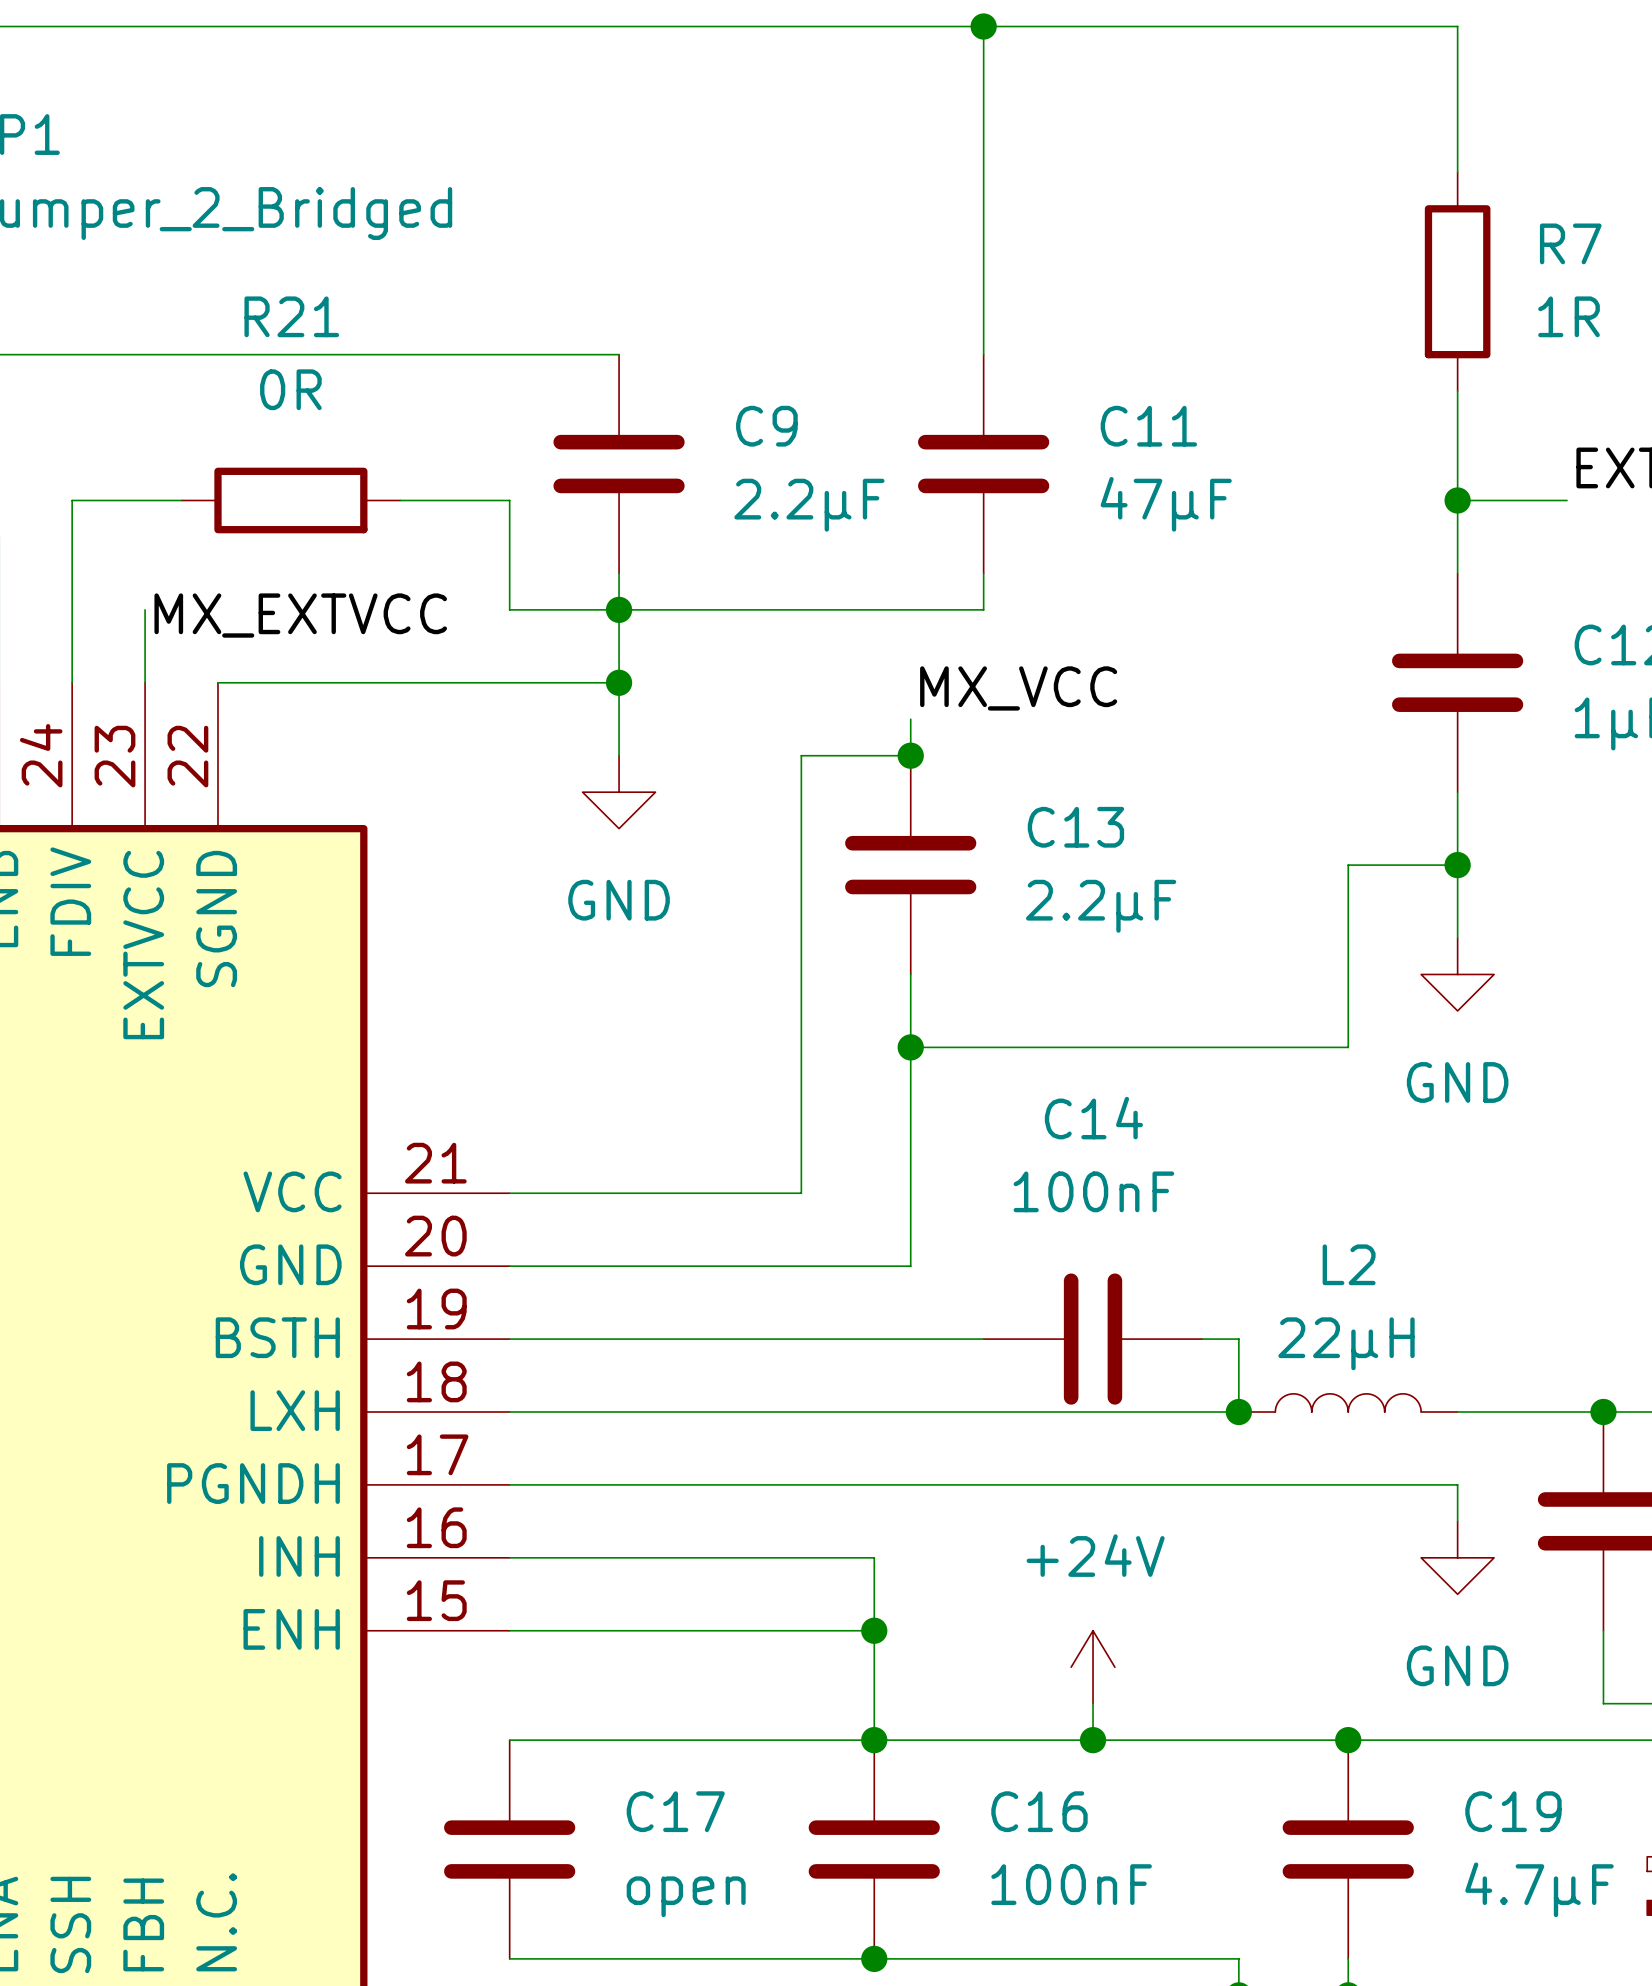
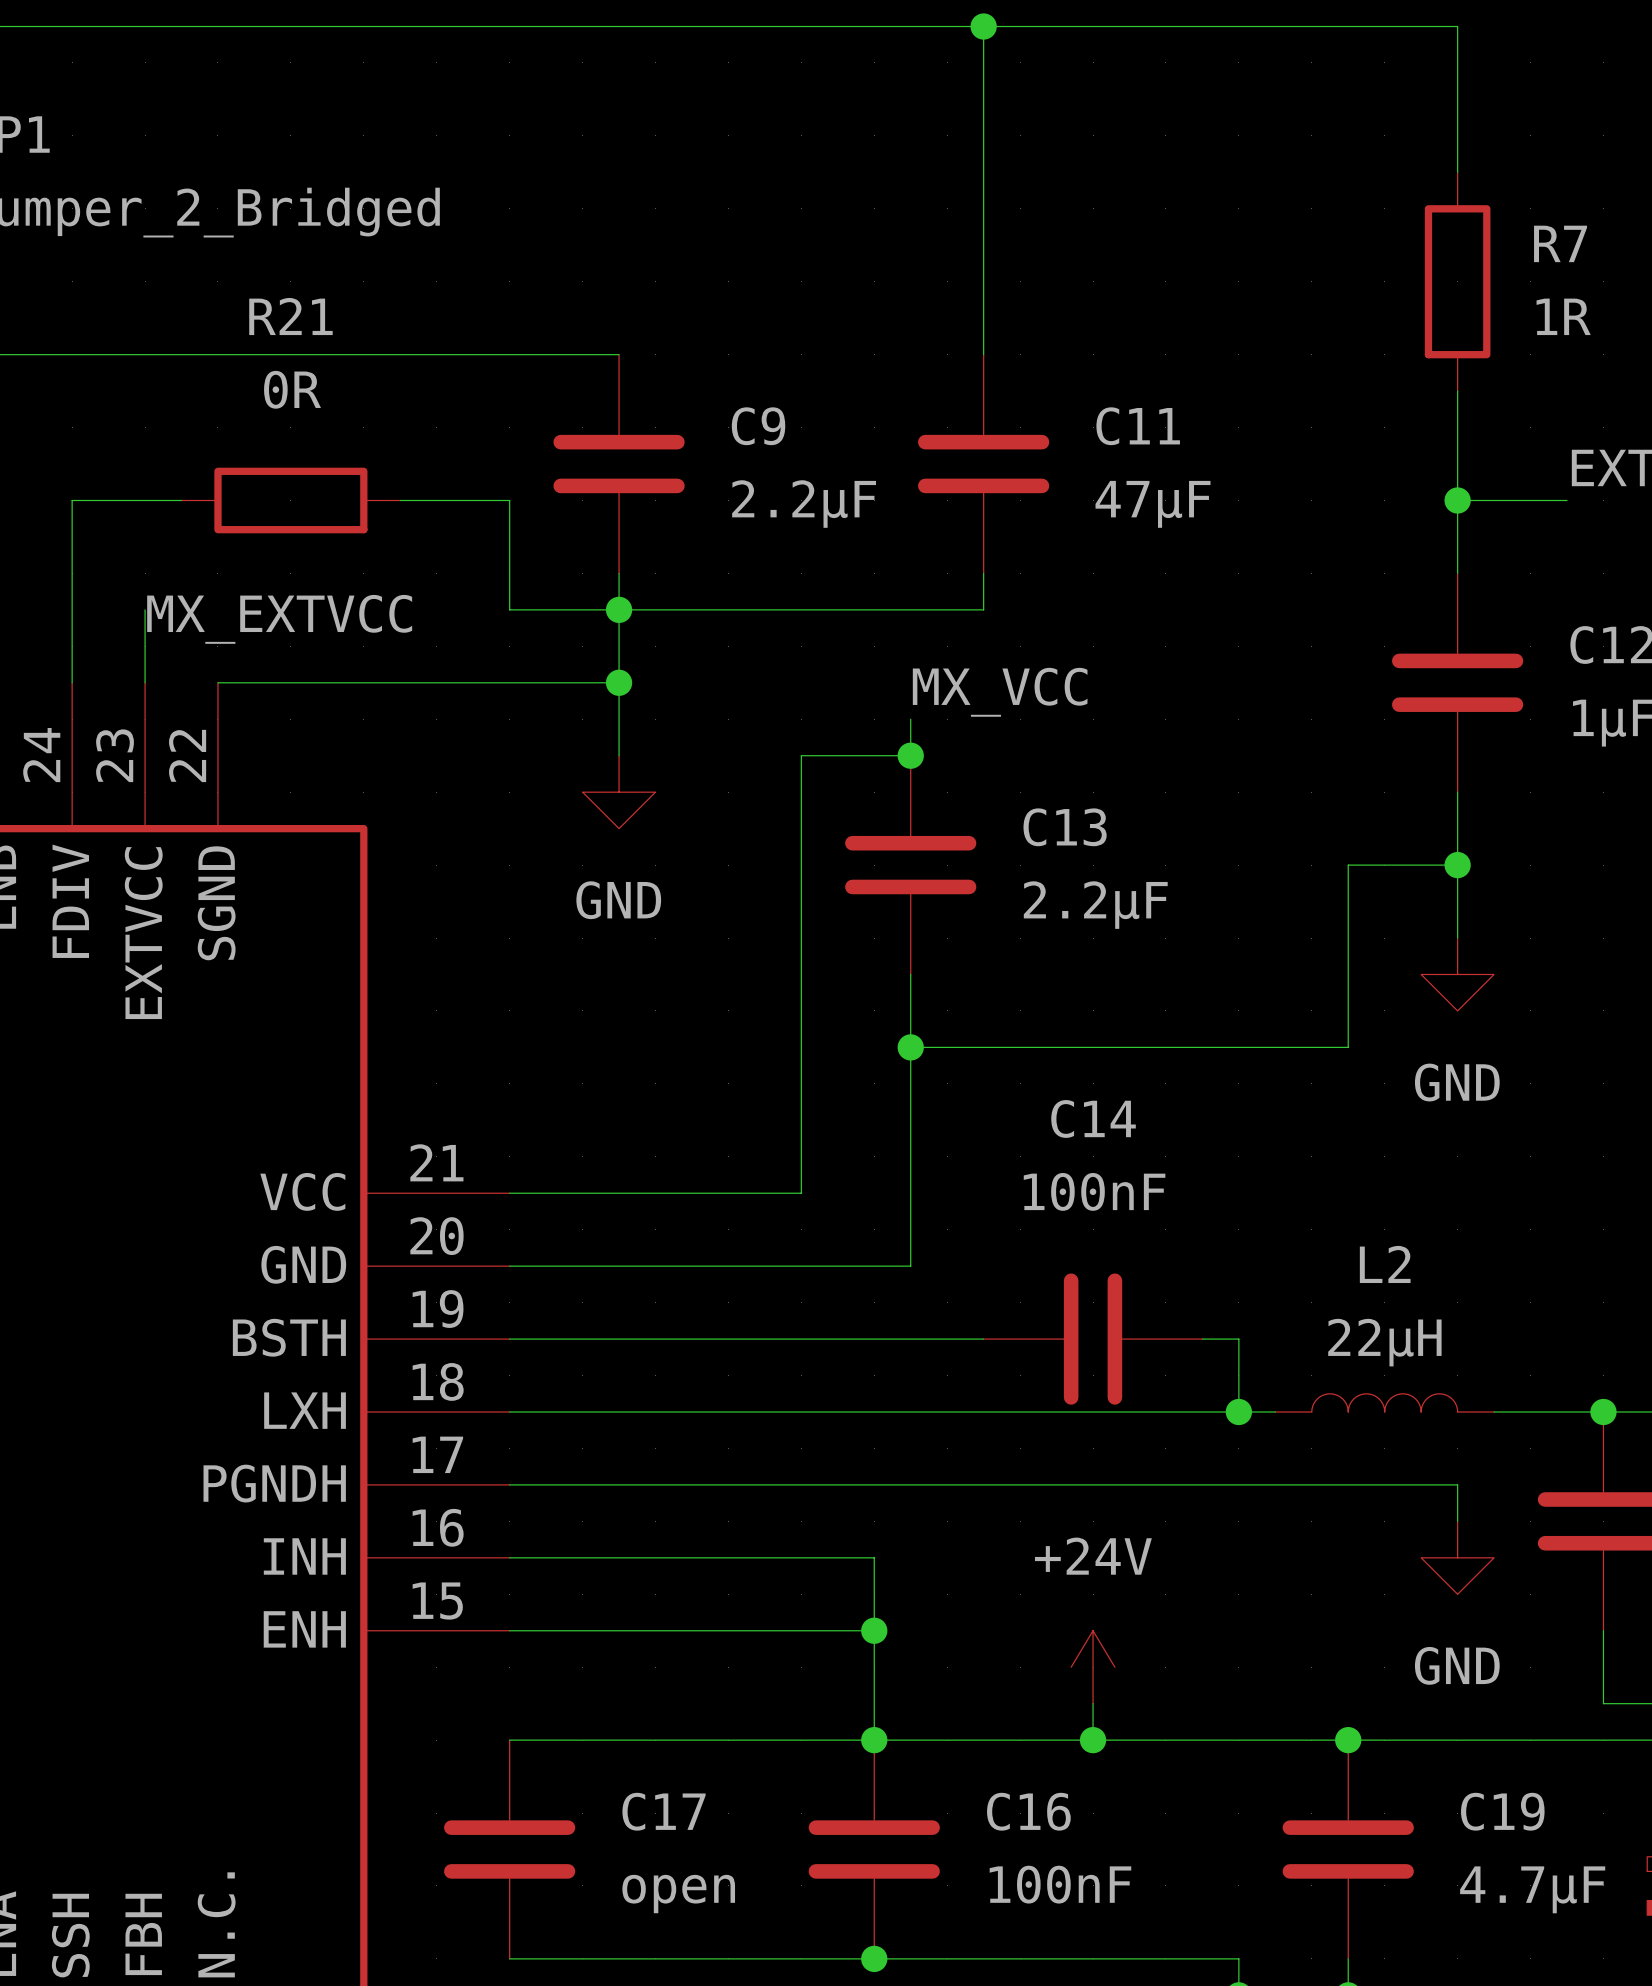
L2 position: (1348, 1402) -> (1384, 1402)

